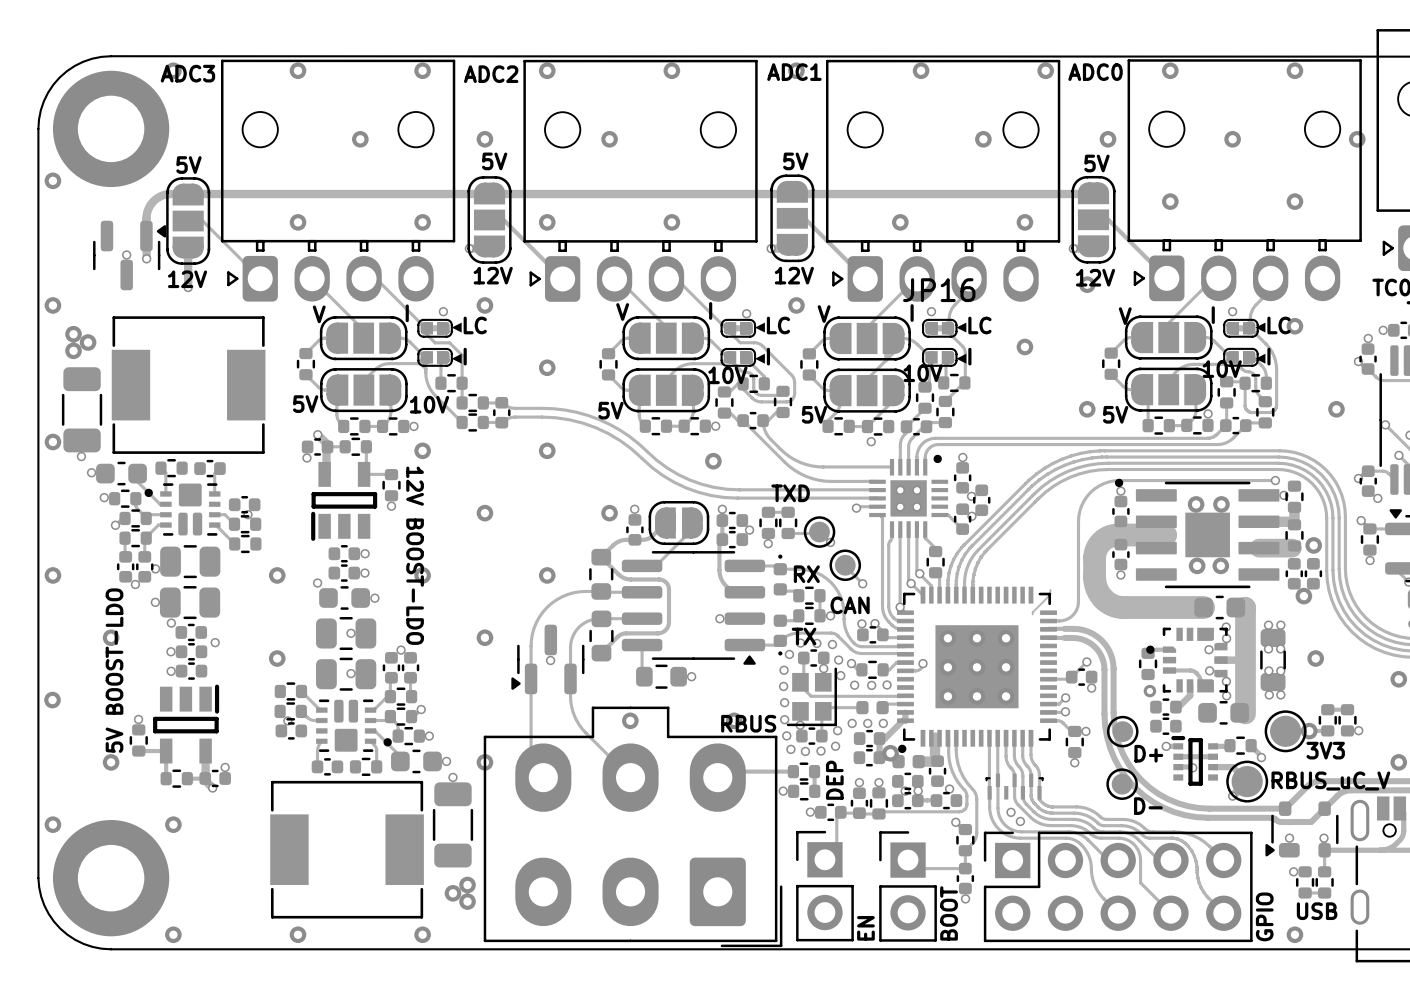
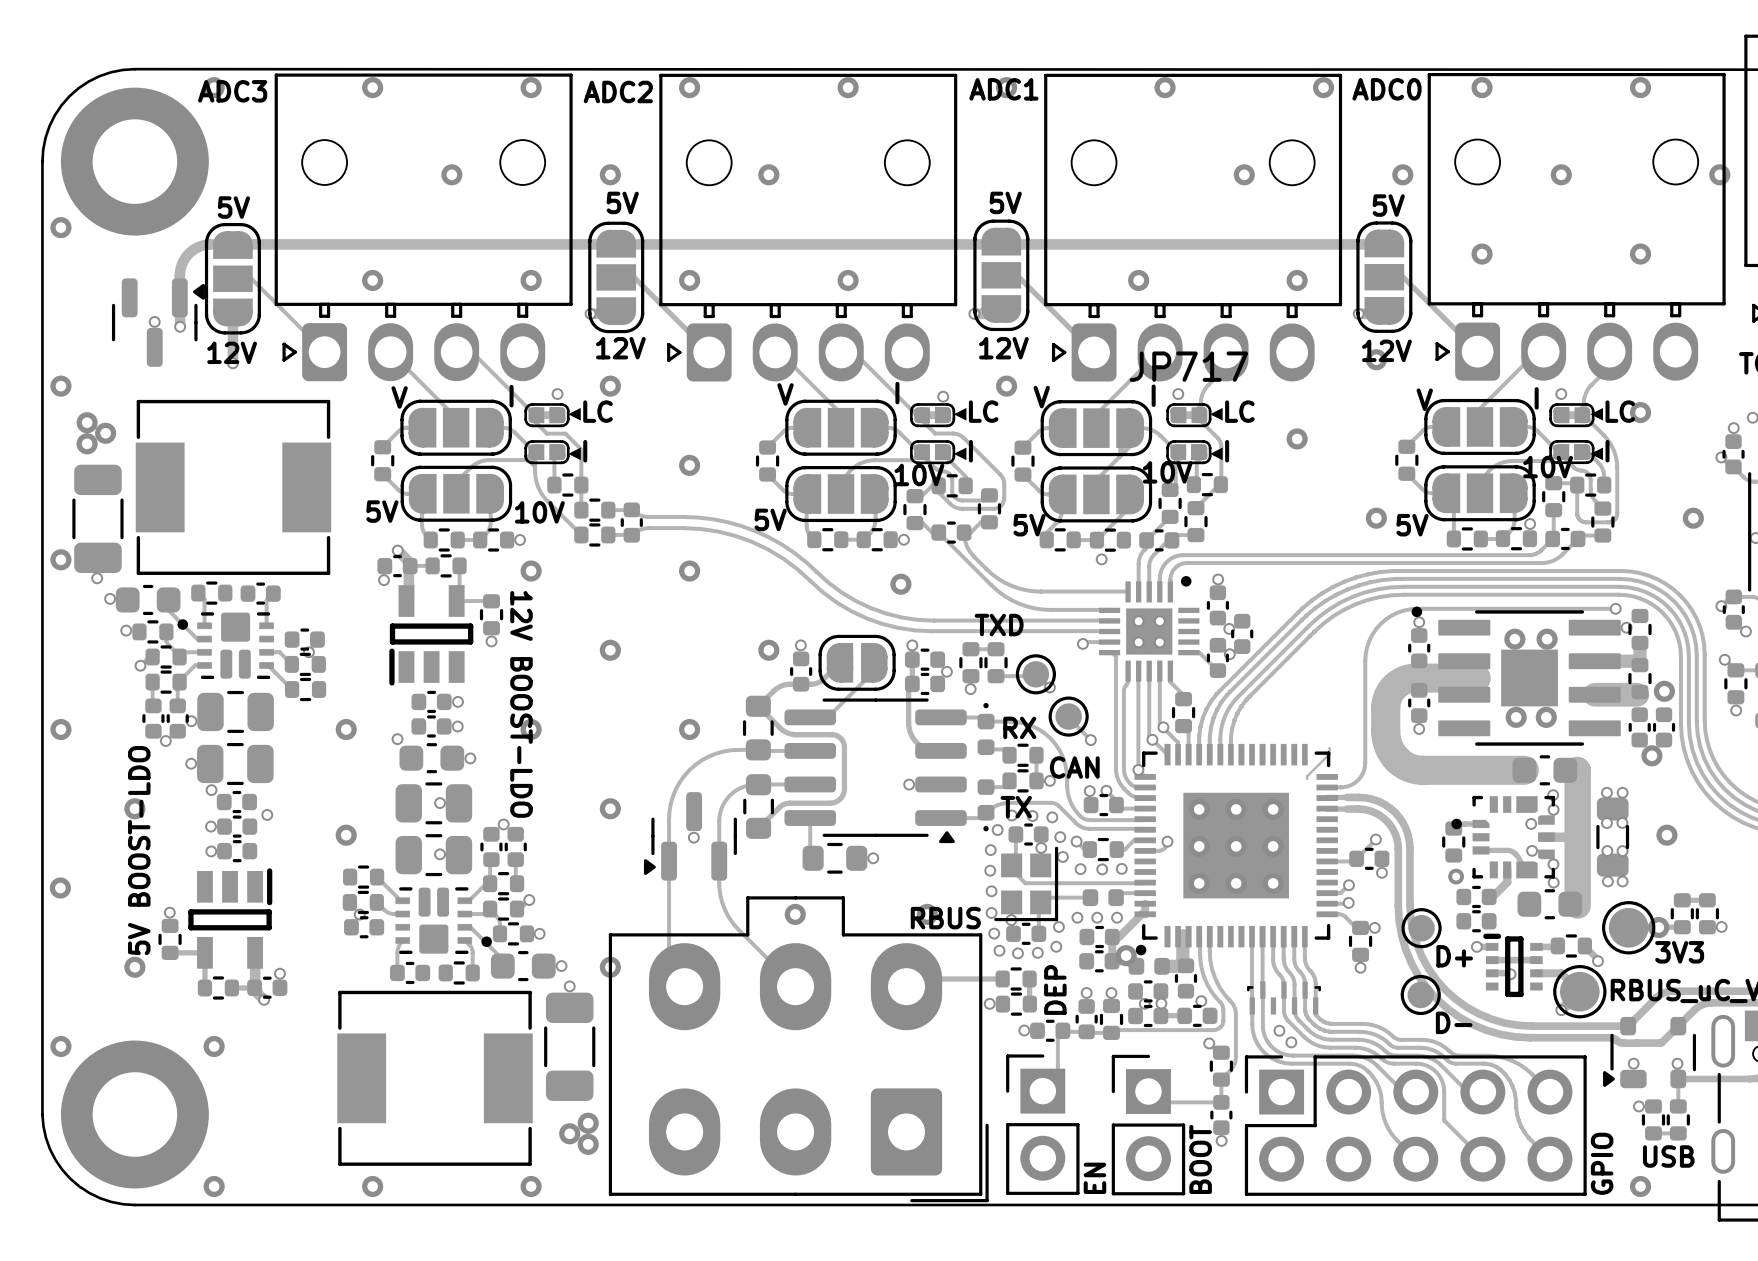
JP16 name: JP16 (939, 290) -> JP717 (1188, 366)

